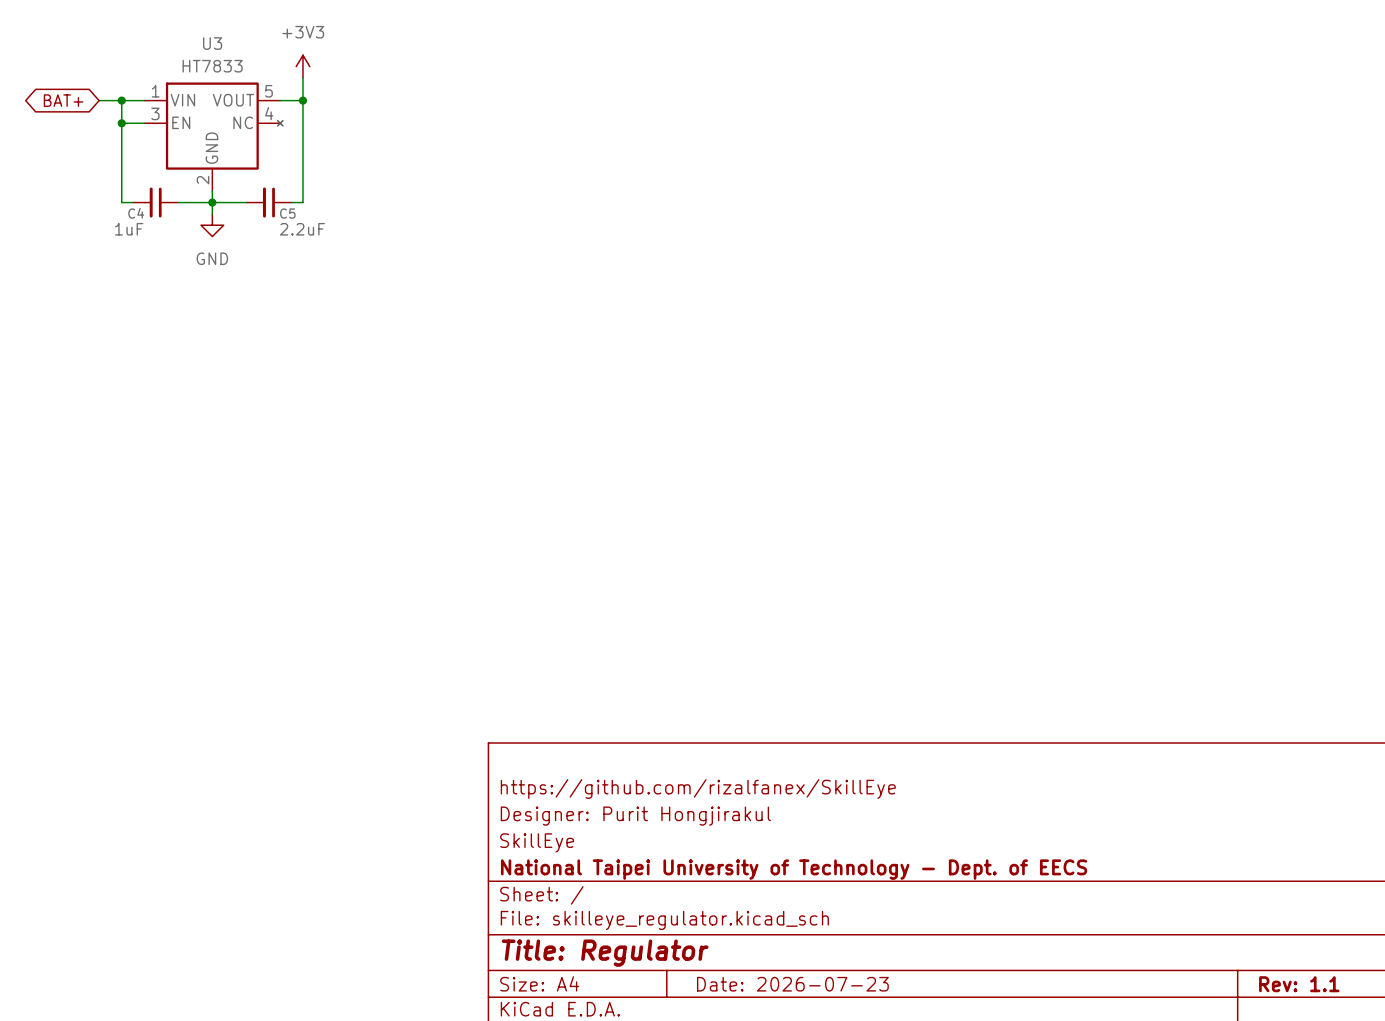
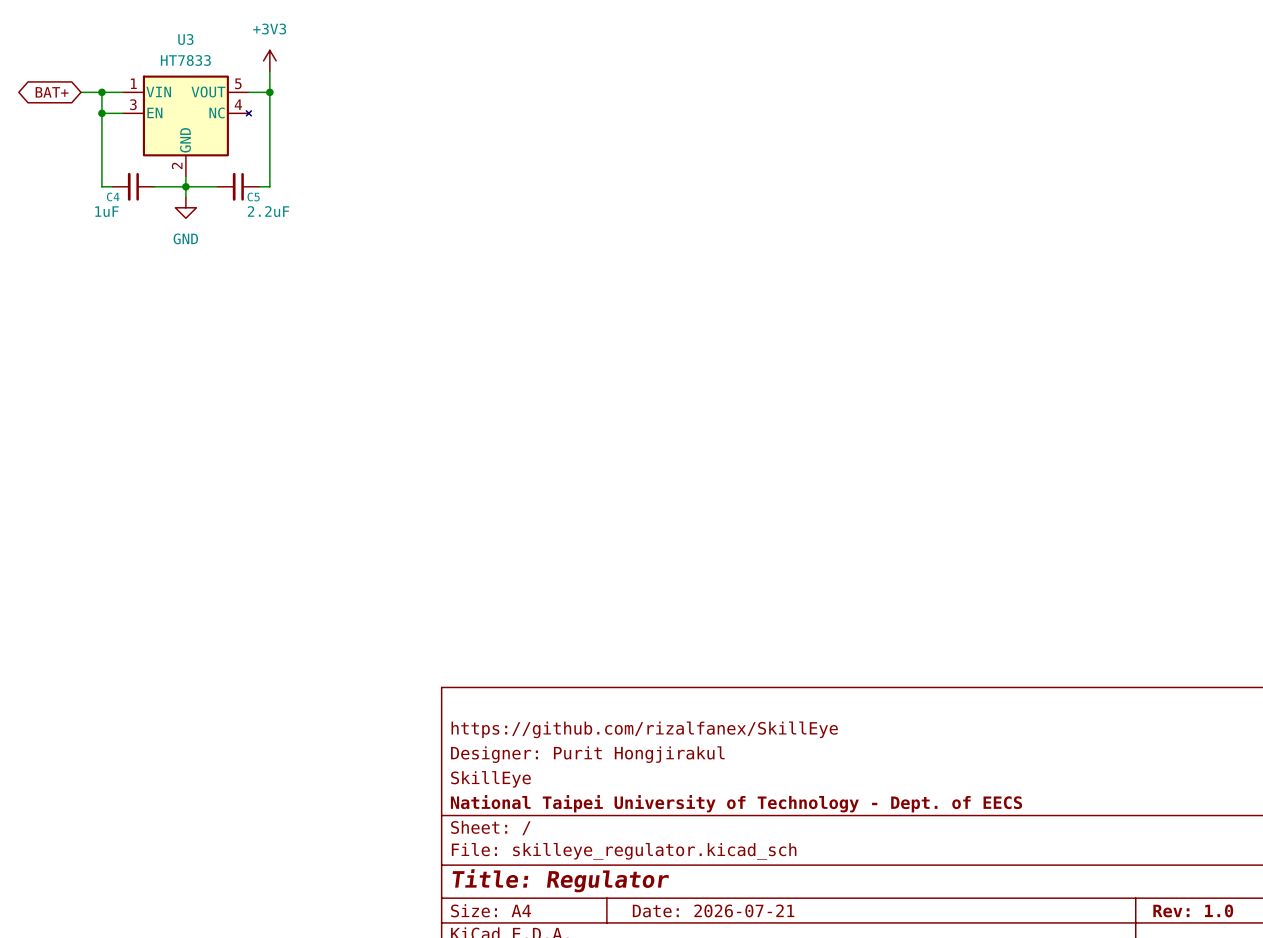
title block: Date: 2026-07-23 (792, 984) -> Date: 2026-07-21 (713, 910)
title block: Rev: 1.1 (1299, 984) -> Rev: 1.0 (1193, 910)

